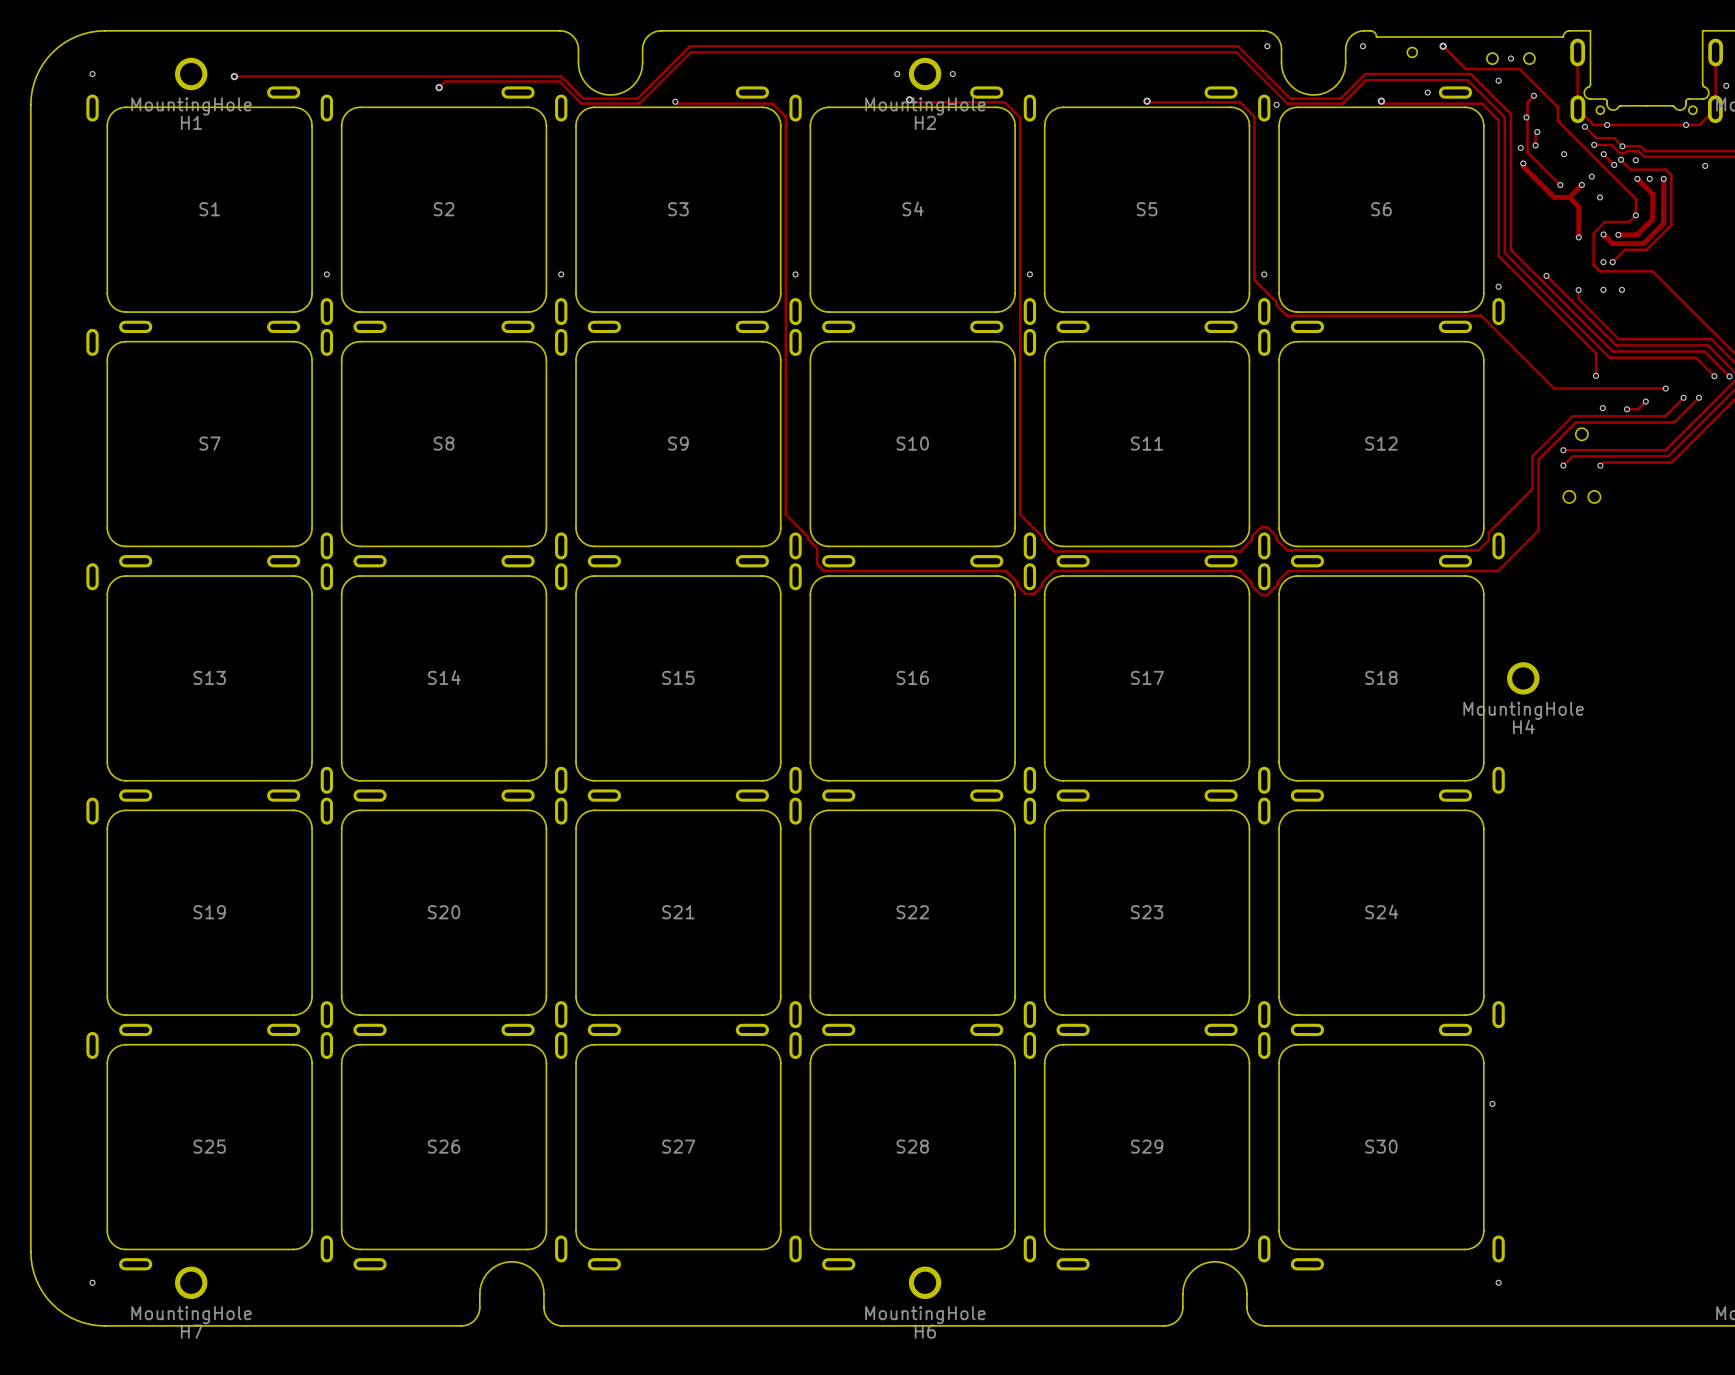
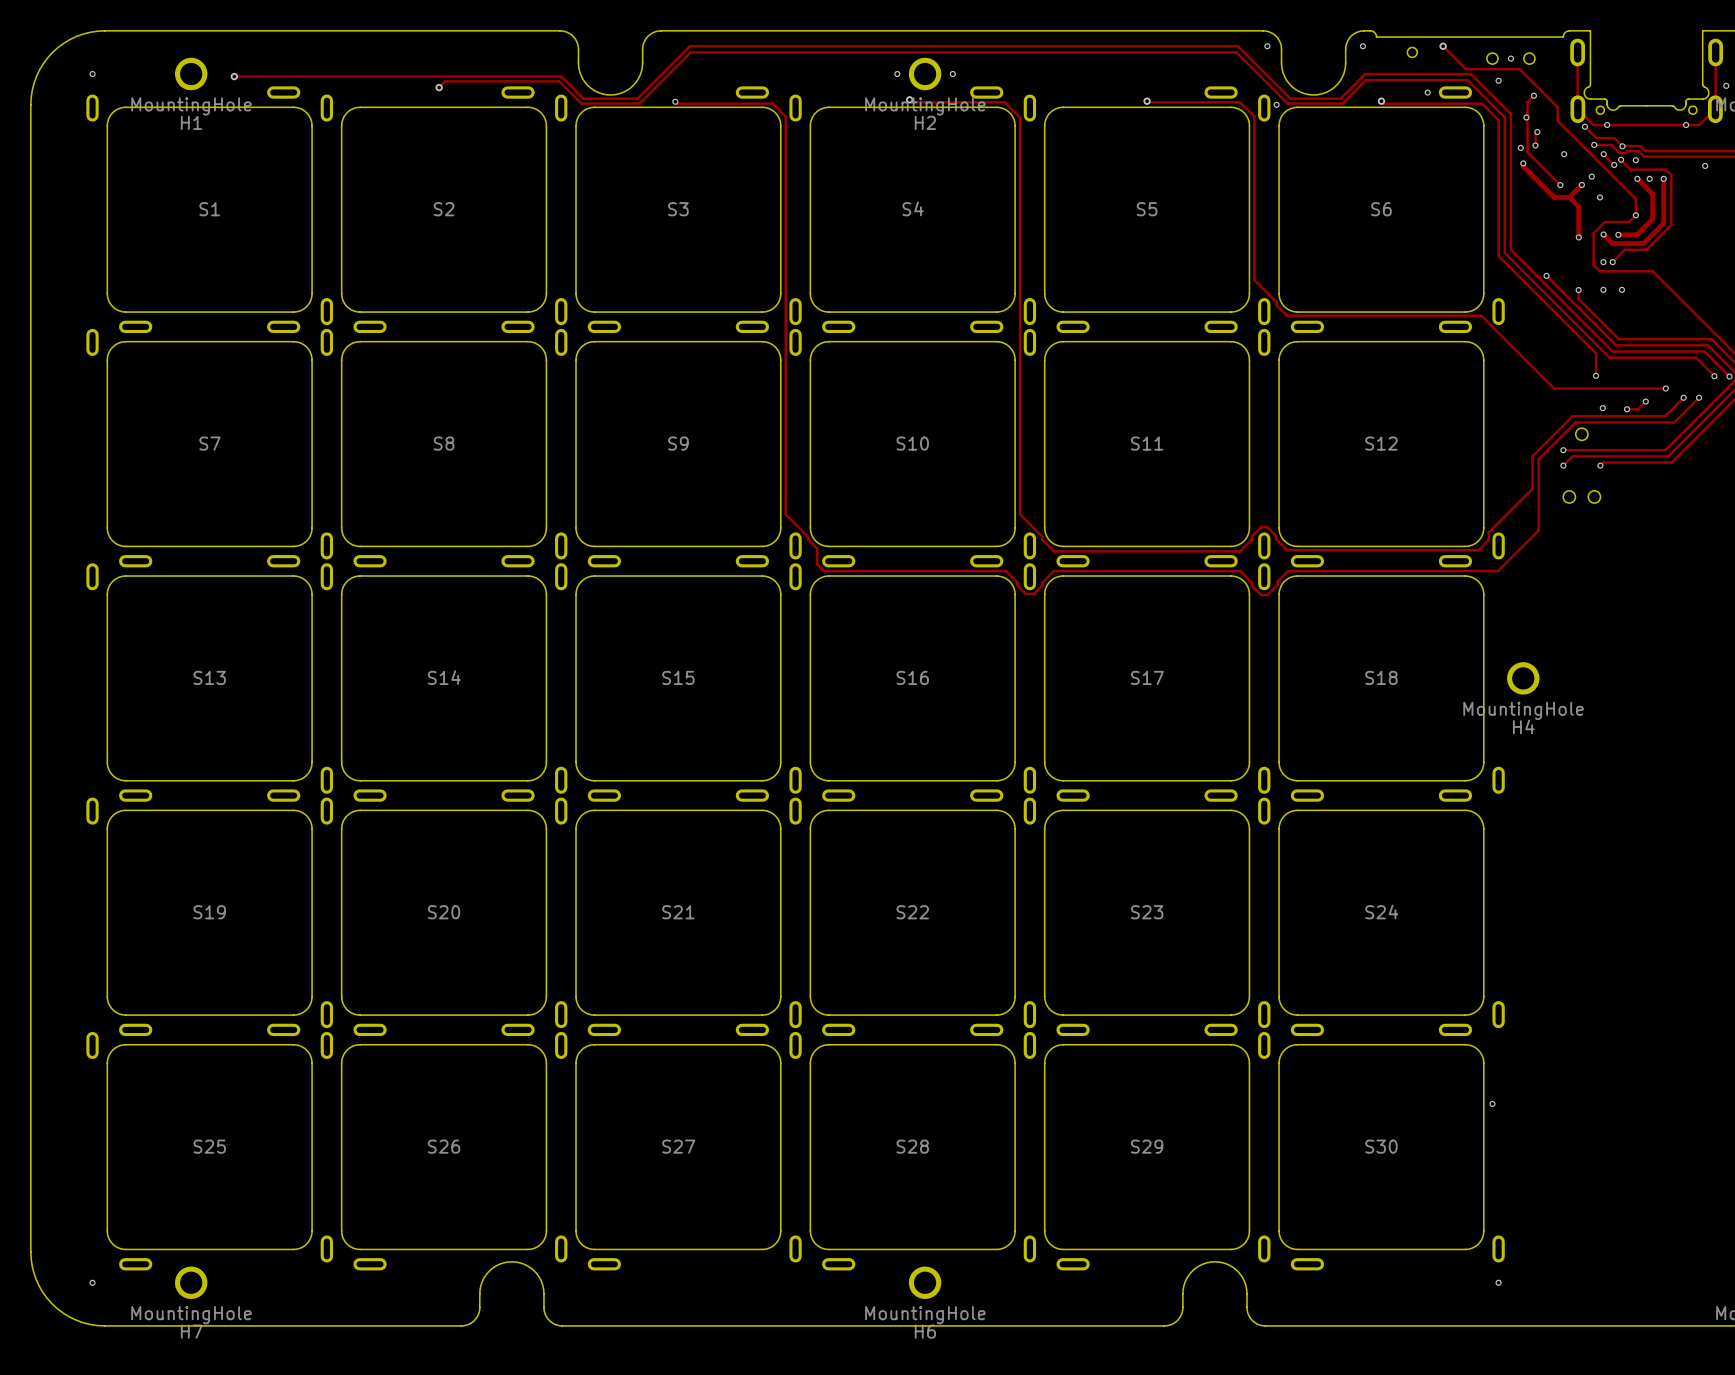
via: (326, 274) -> none
via: (561, 274) -> none
via: (795, 274) -> none
via: (1029, 274) -> none
via: (1264, 274) -> none
via: (1498, 286) -> none

